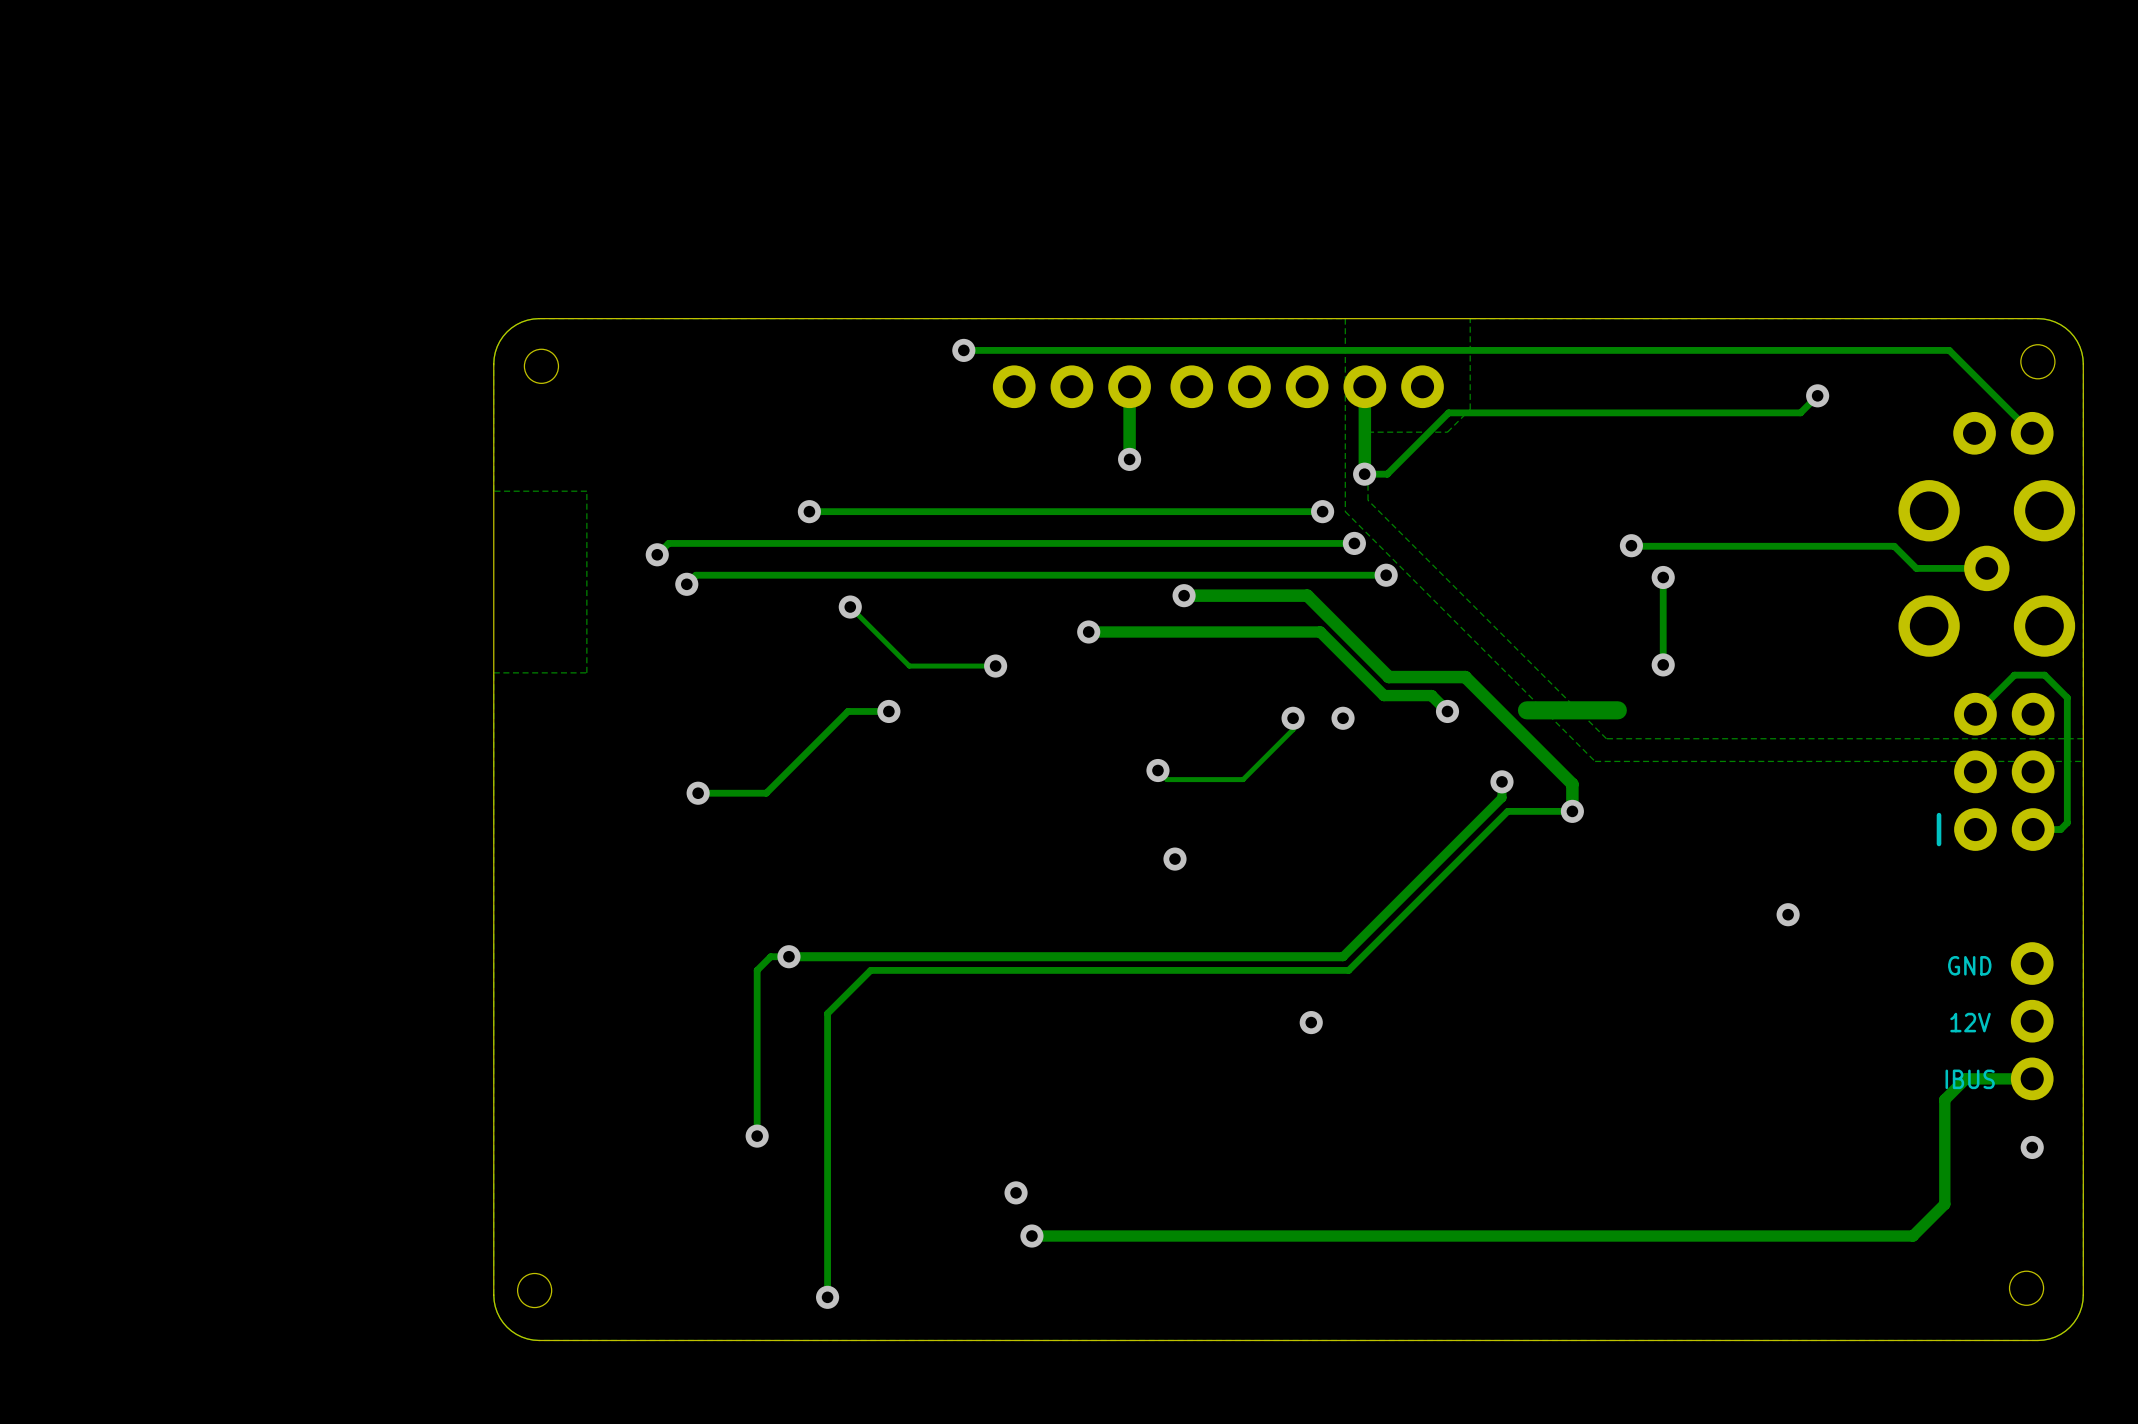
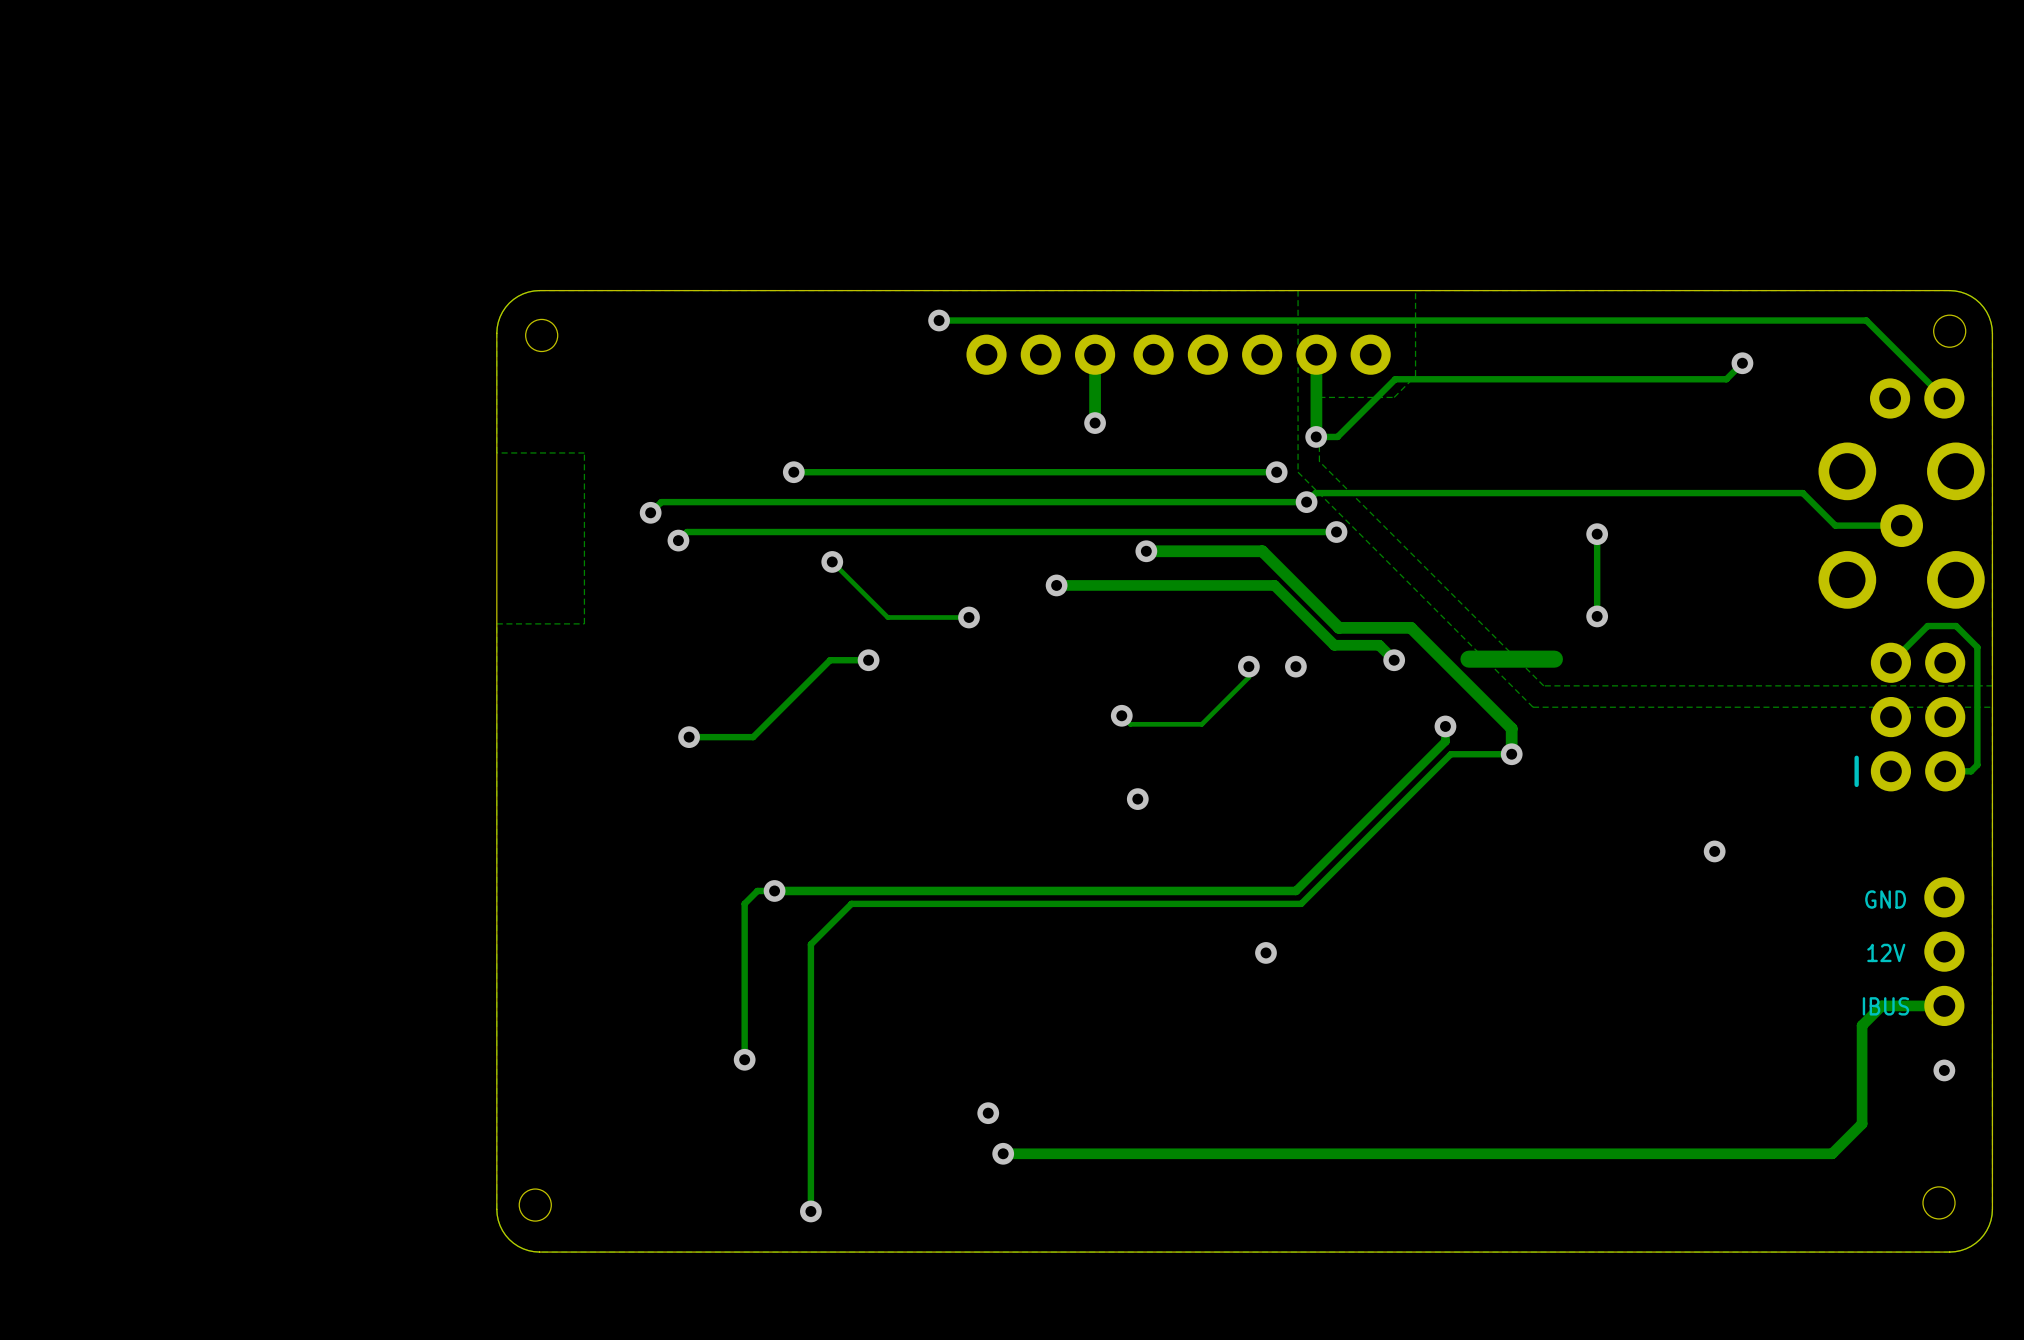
track: (1631, 545) (1894, 546) -> (1306, 502) (1315, 493) (1802, 493) (1814, 504)
via: (1631, 545) -> none

